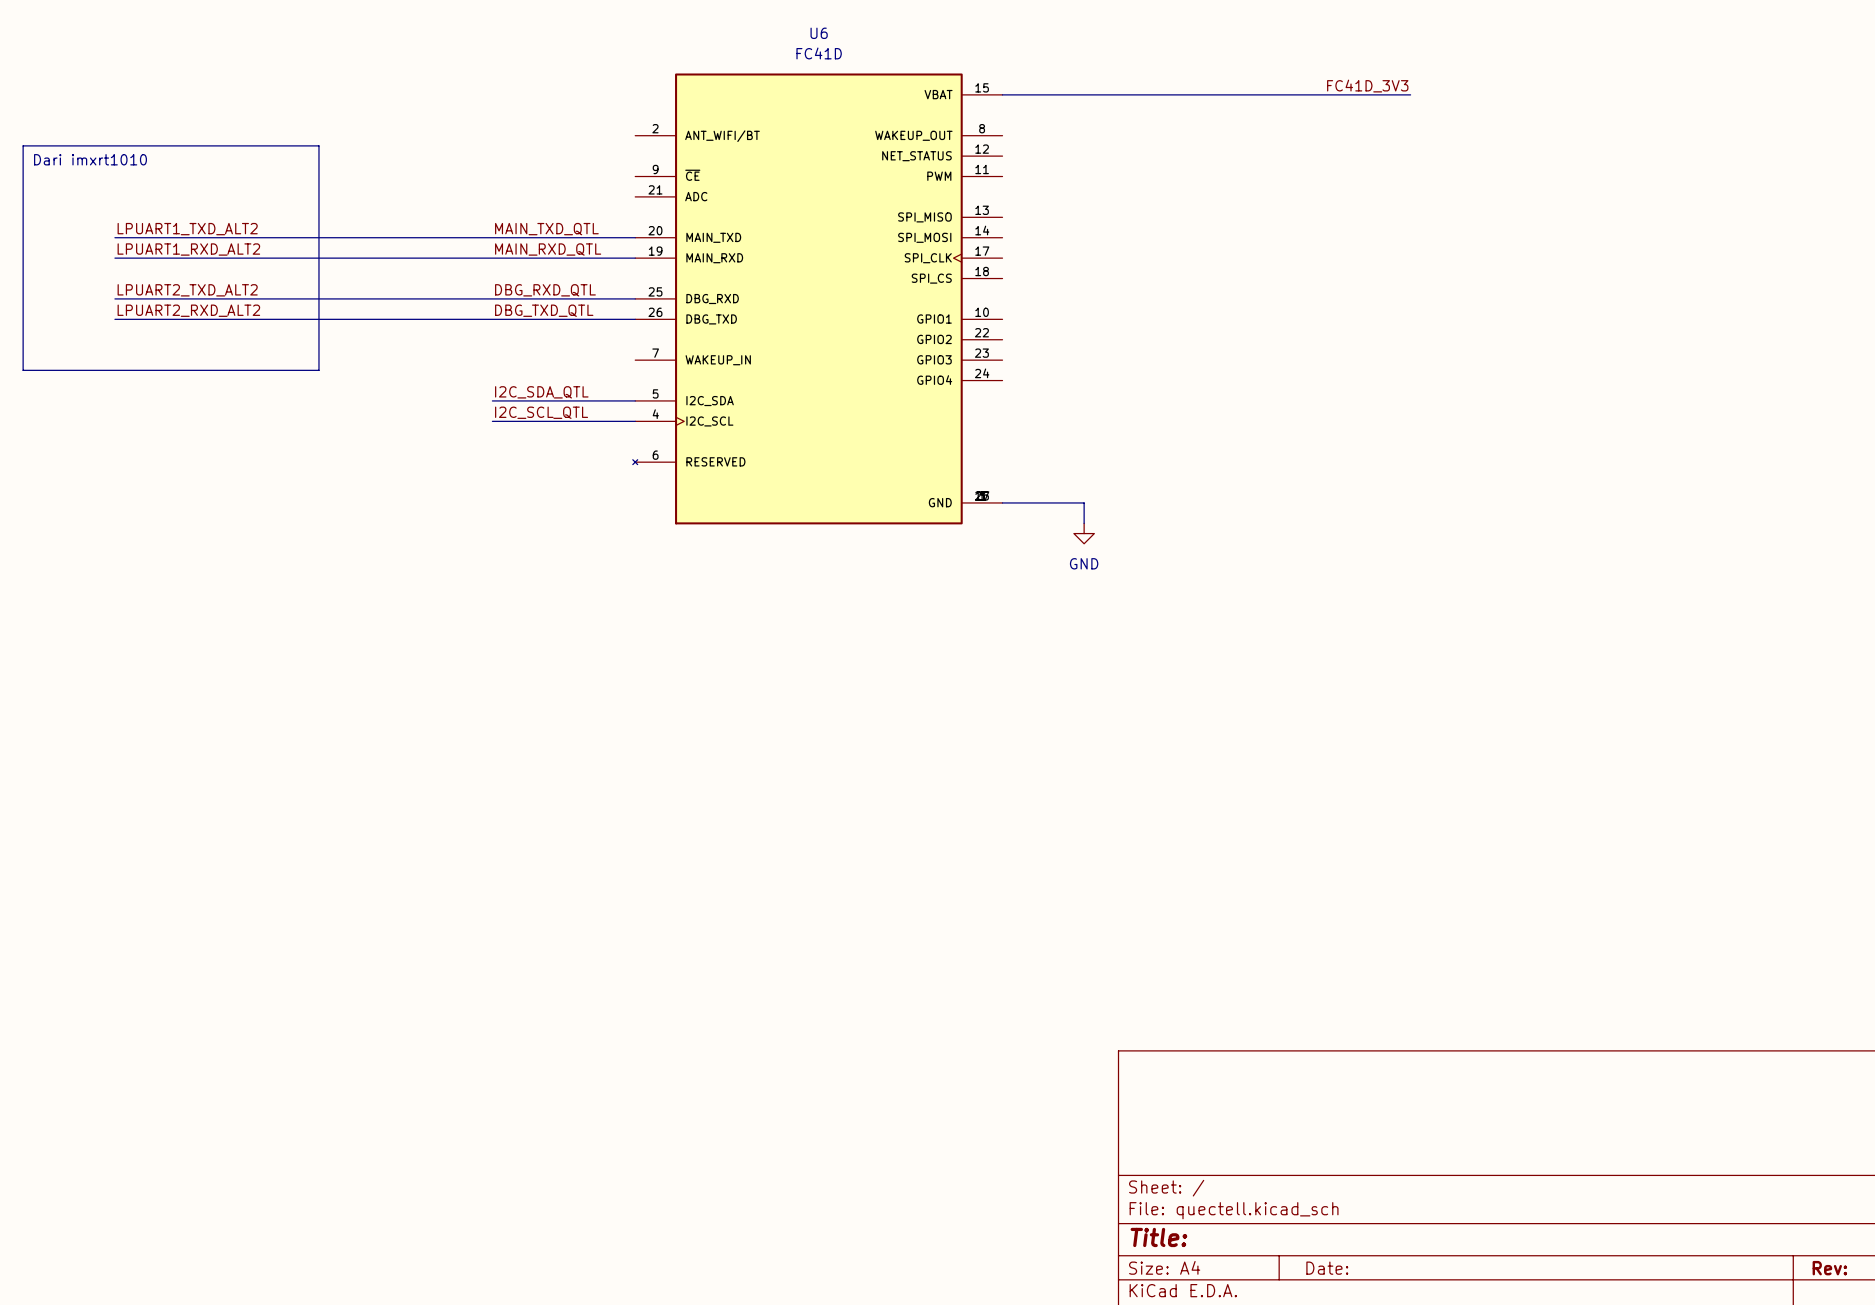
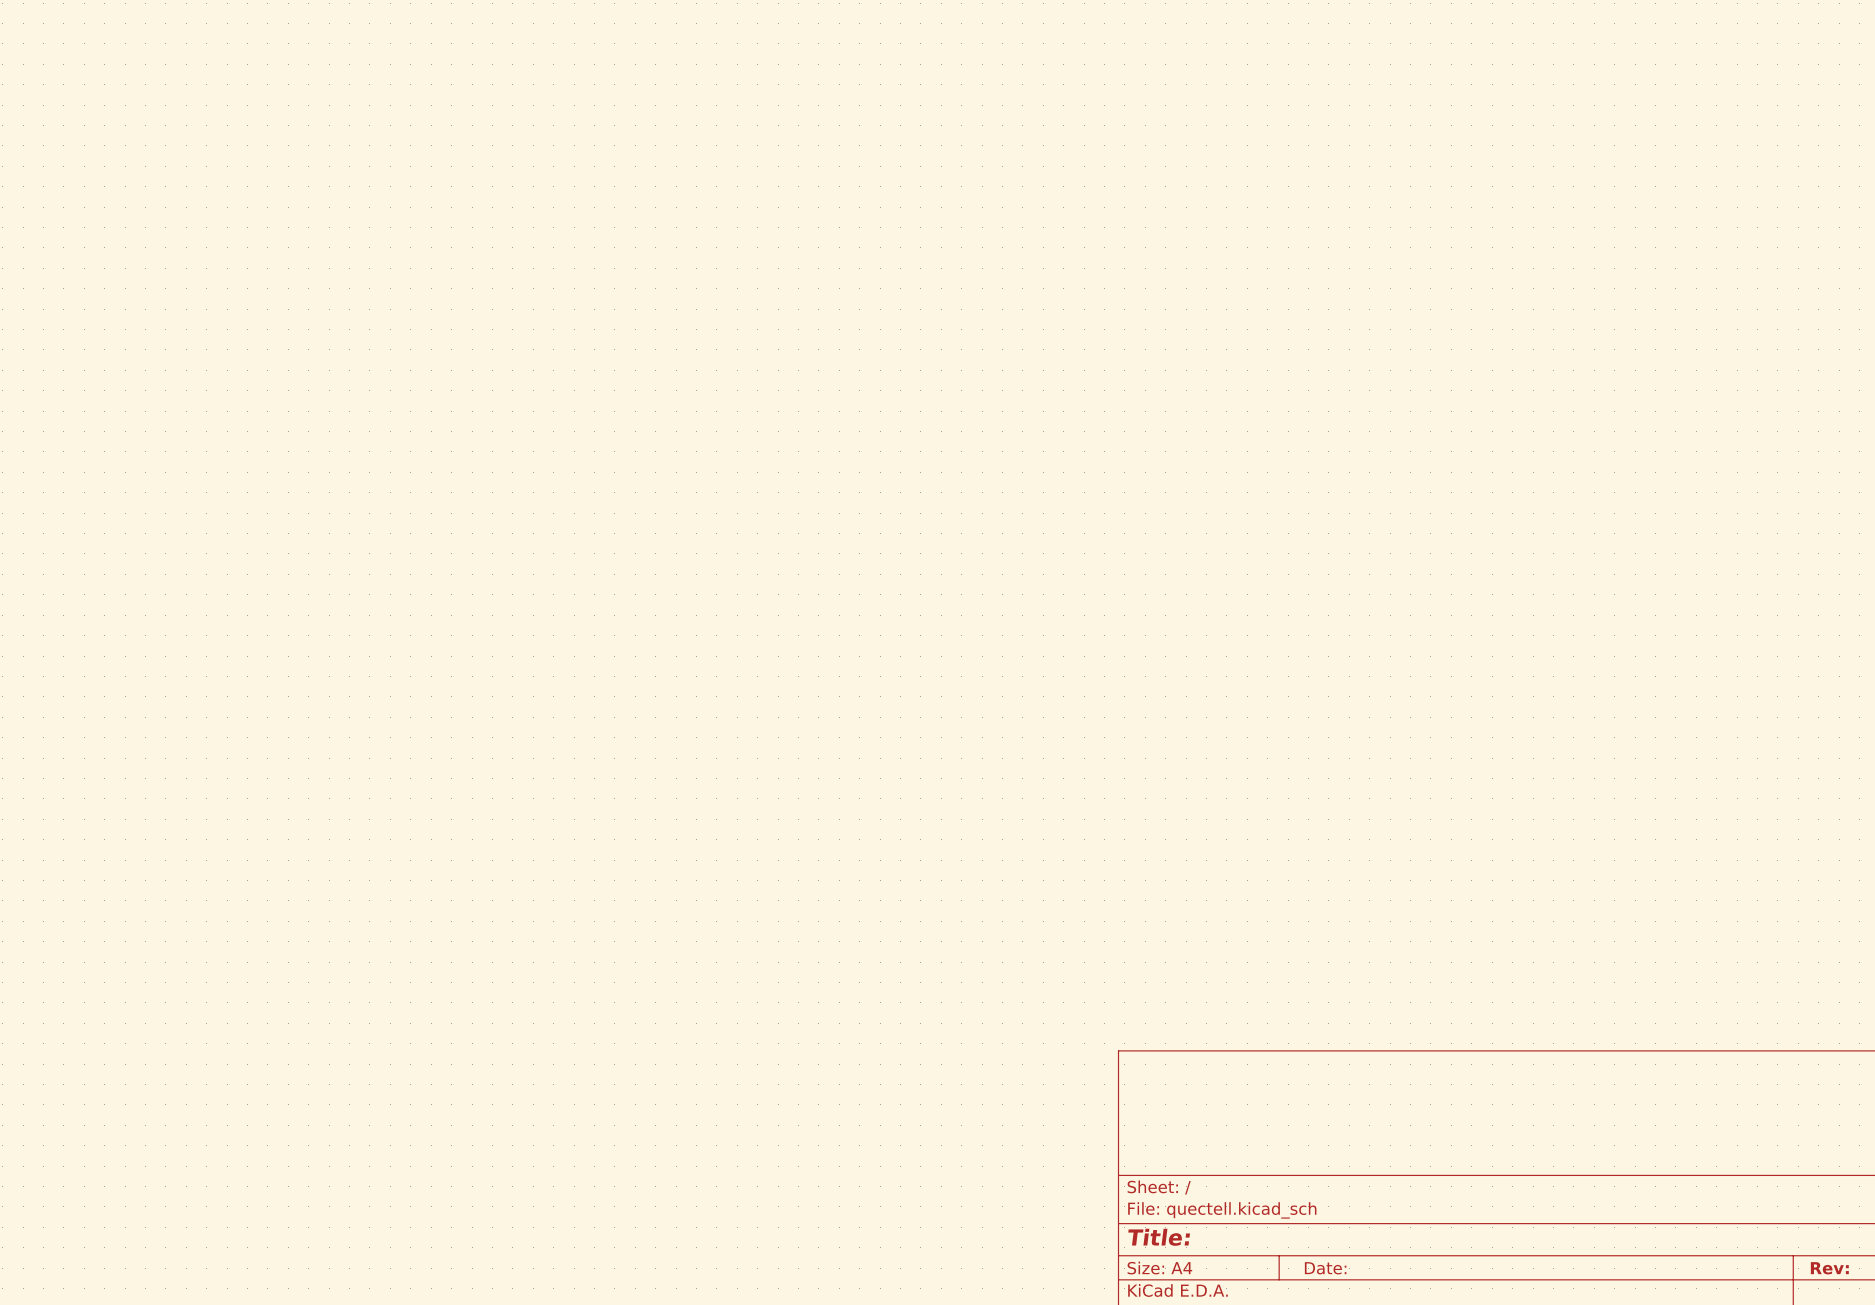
label: FC41D_3V3 (1367, 86) -> none
wire: (1002, 94) (1410, 94) -> none
line: (23, 145) (318, 145) (318, 370) (23, 370) (23, 145) -> none
text: Dari imxrt1010 (90, 159) -> none
label: LPUART1_TXD_ALT2 (187, 229) -> none
label: MAIN_TXD_QTL (546, 229) -> none
wire: (114, 237) (635, 237) -> none
label: LPUART1_RXD_ALT2 (188, 249) -> none
label: MAIN_RXD_QTL (548, 249) -> none
wire: (114, 258) (635, 258) -> none
label: LPUART2_TXD_ALT2 (187, 290) -> none
label: DBG_RXD_QTL (545, 290) -> none
wire: (114, 298) (635, 298) -> none
U6: FC41D (817, 298) -> none
label: LPUART2_RXD_ALT2 (188, 310) -> none
label: DBG_TXD_QTL (544, 310) -> none
wire: (114, 319) (635, 319) -> none
label: I2C_SDA_QTL (541, 392) -> none
wire: (492, 400) (635, 400) -> none
label: I2C_SCL_QTL (541, 412) -> none
wire: (492, 421) (635, 421) -> none
wire: (1002, 502) (1084, 502) (1084, 523) -> none
power symbol: GND (1084, 533) -> none

